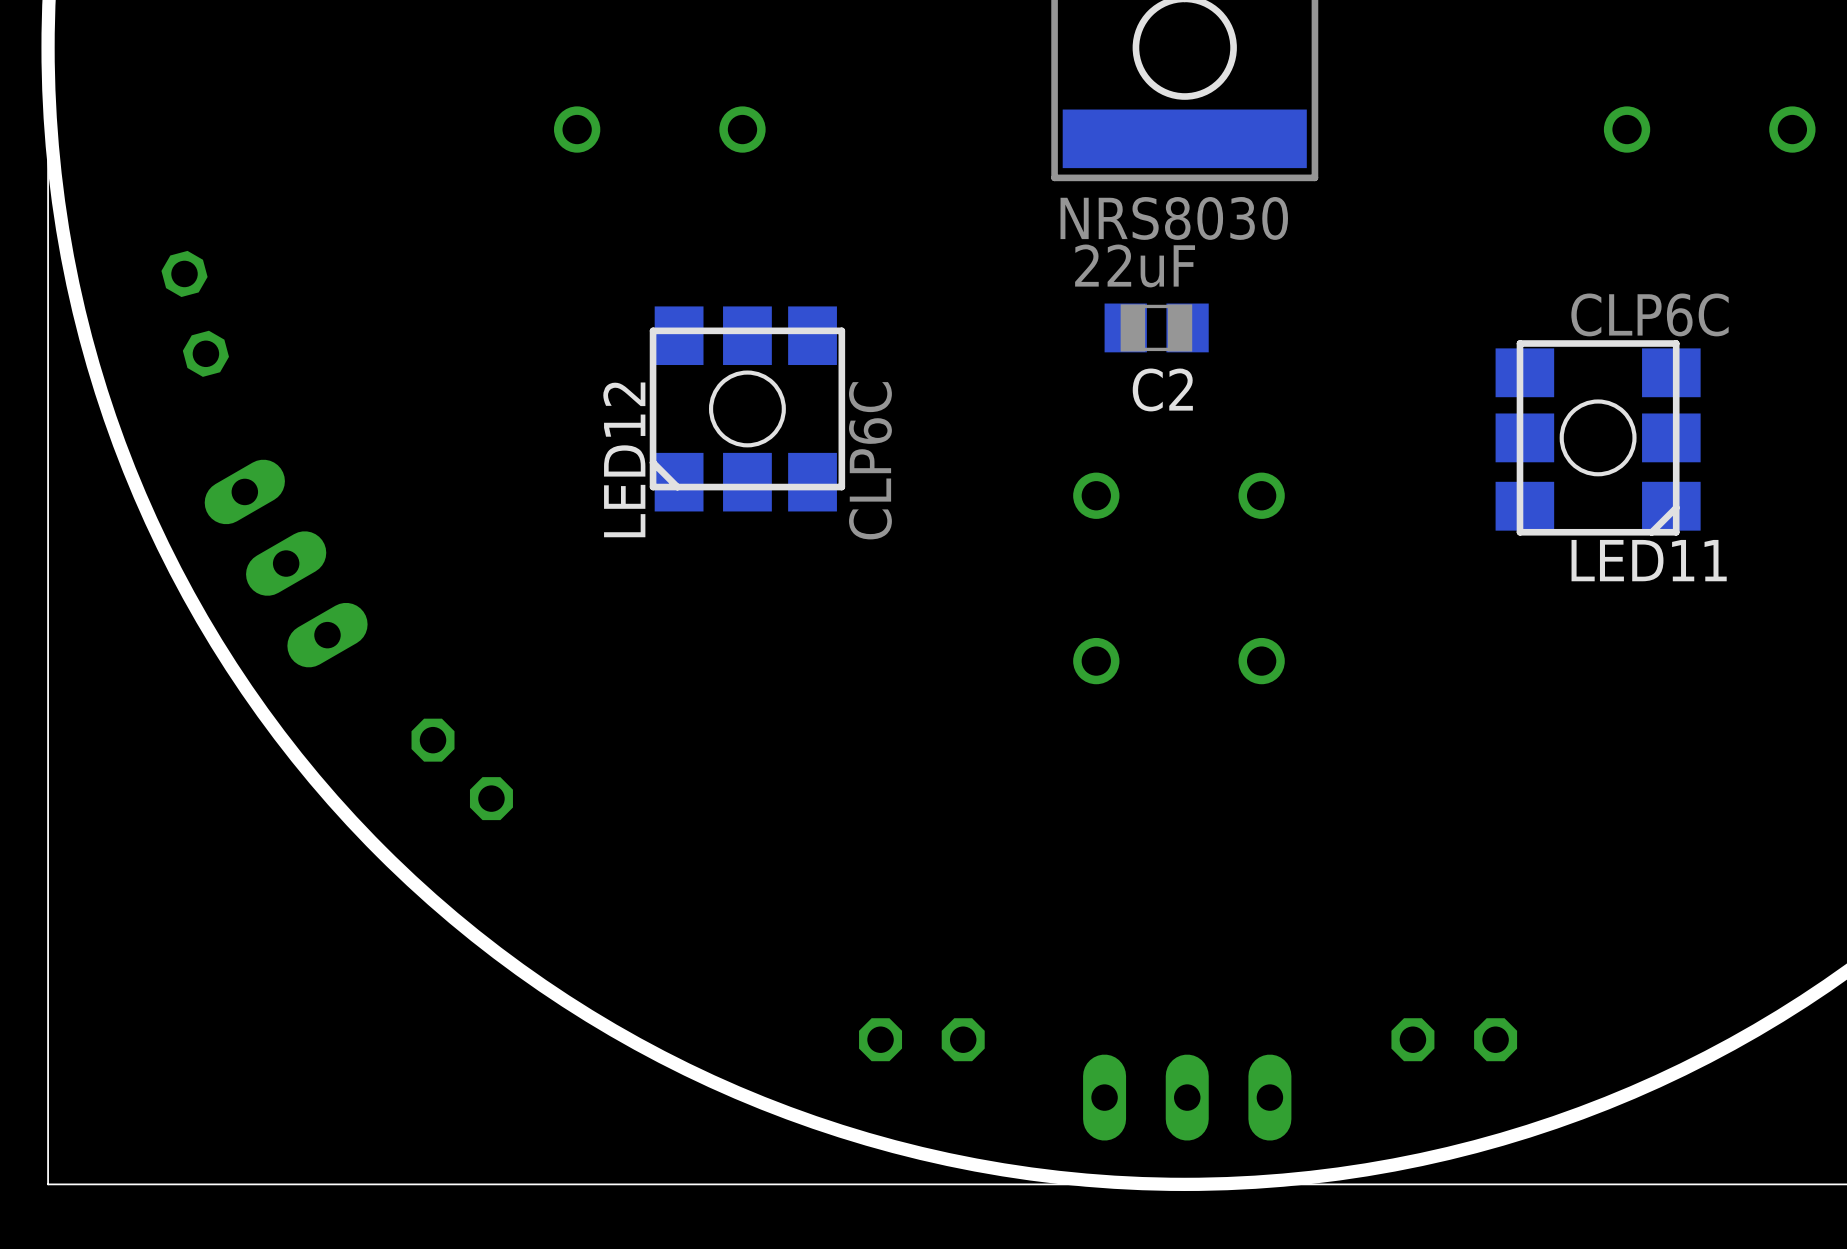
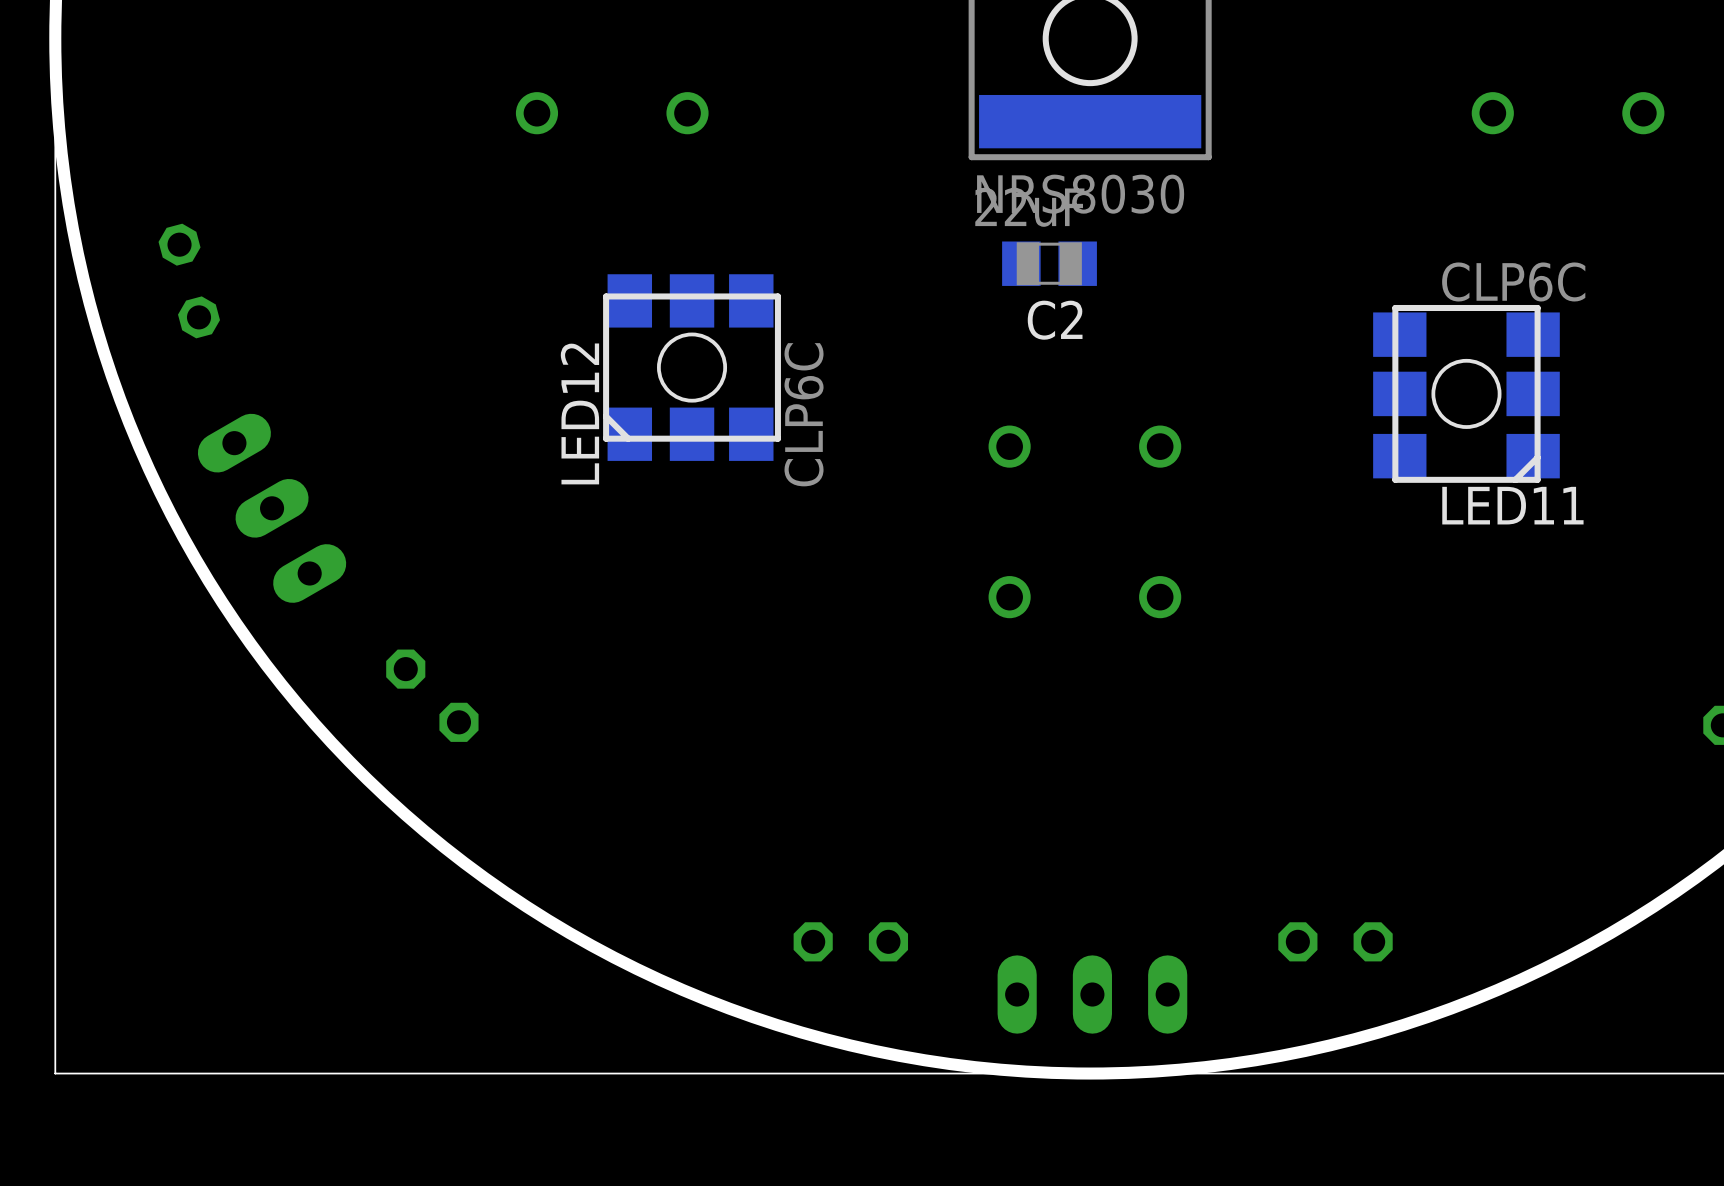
C2 position: (1156, 327) -> (1049, 263)

